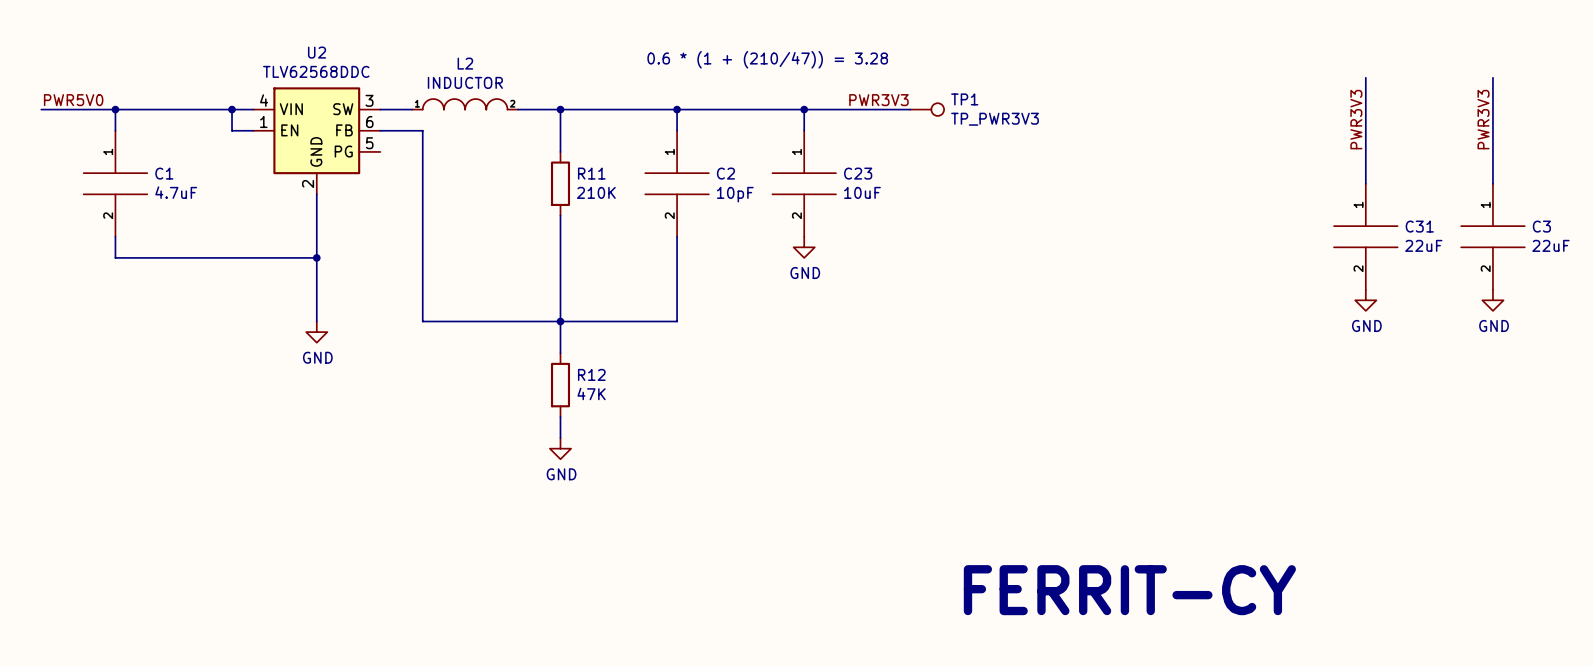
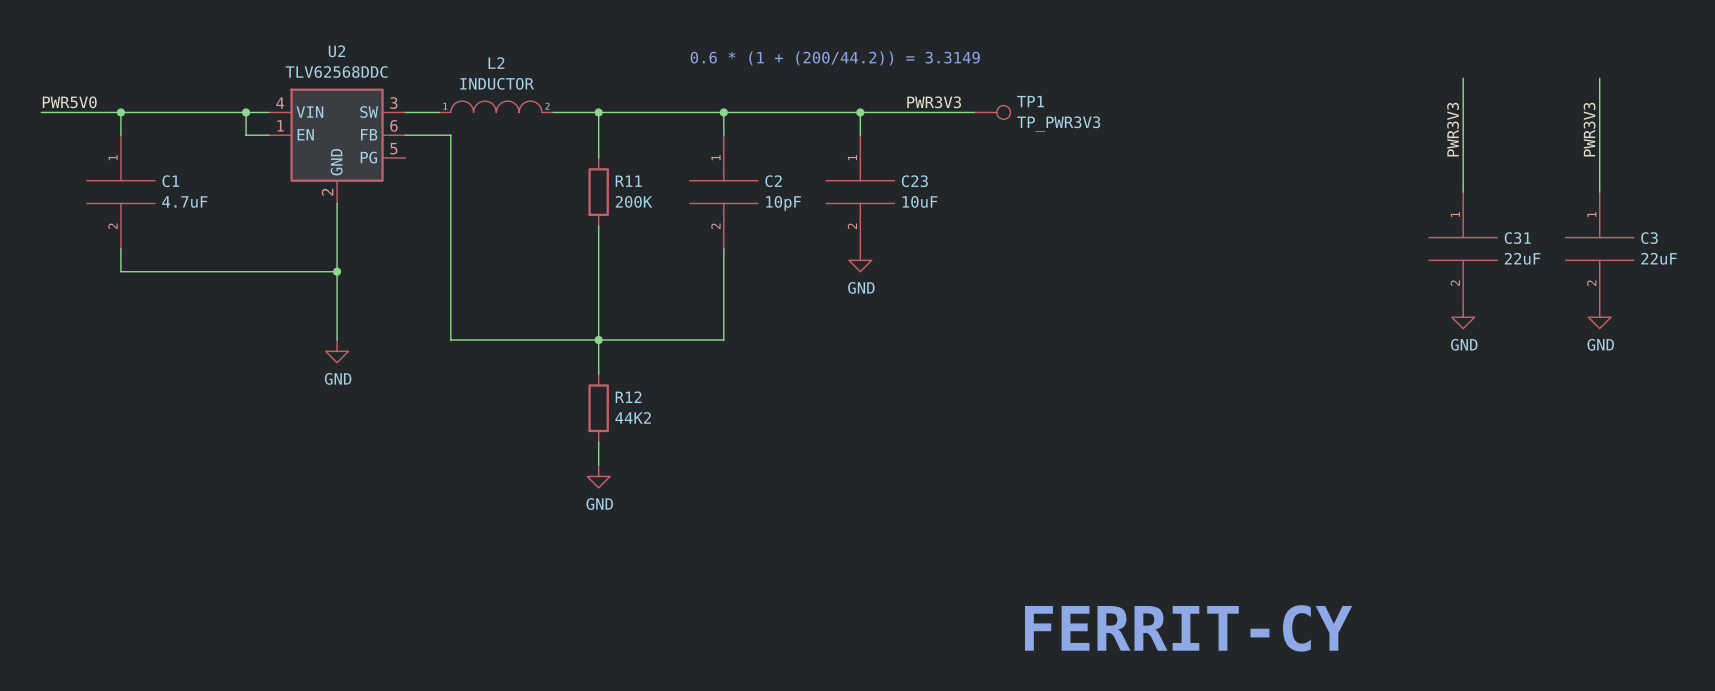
text: 0.6 * (1 + (210/47)) = 3.28 (767, 59) -> 0.6 * (1 + (200/44.2)) = 3.3149 (835, 58)
R11 value: 210K (596, 192) -> 200K (633, 201)
R12 value: 47K (591, 393) -> 44K2 (633, 417)

